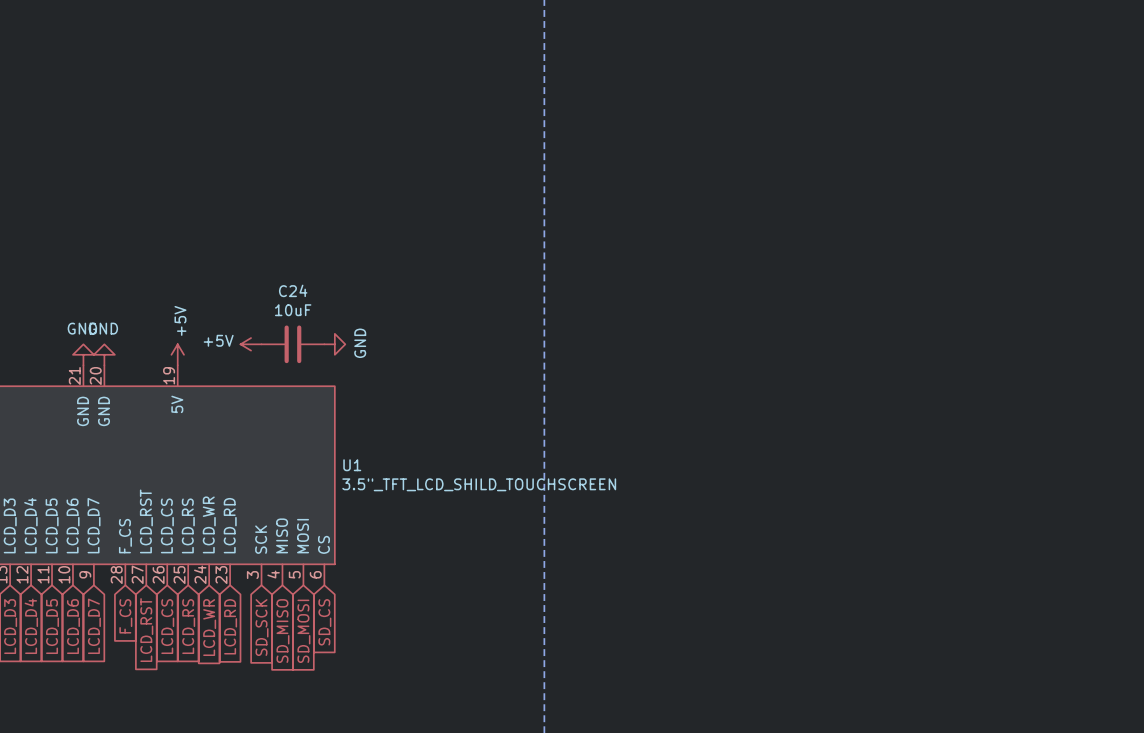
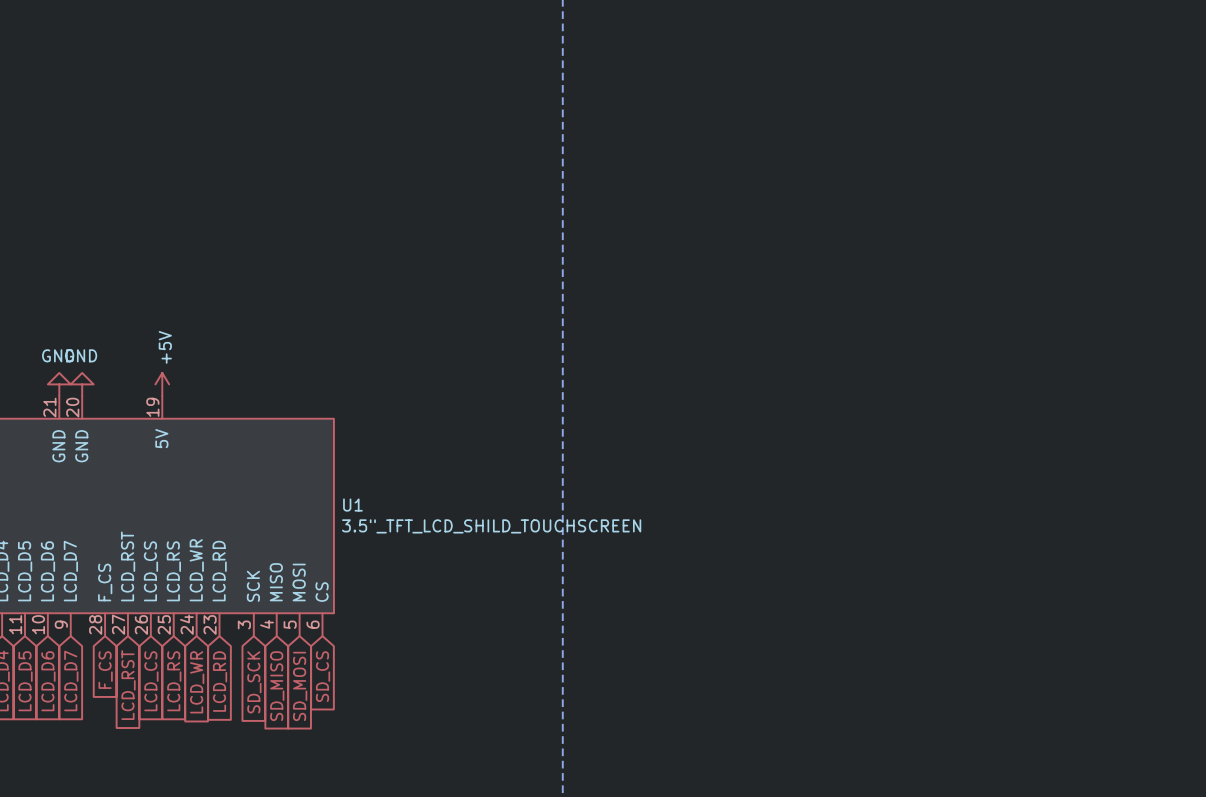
power symbol: +5V (251, 344) -> none
C24: 10uF (292, 344) -> none
power symbol: GND (334, 344) -> none

